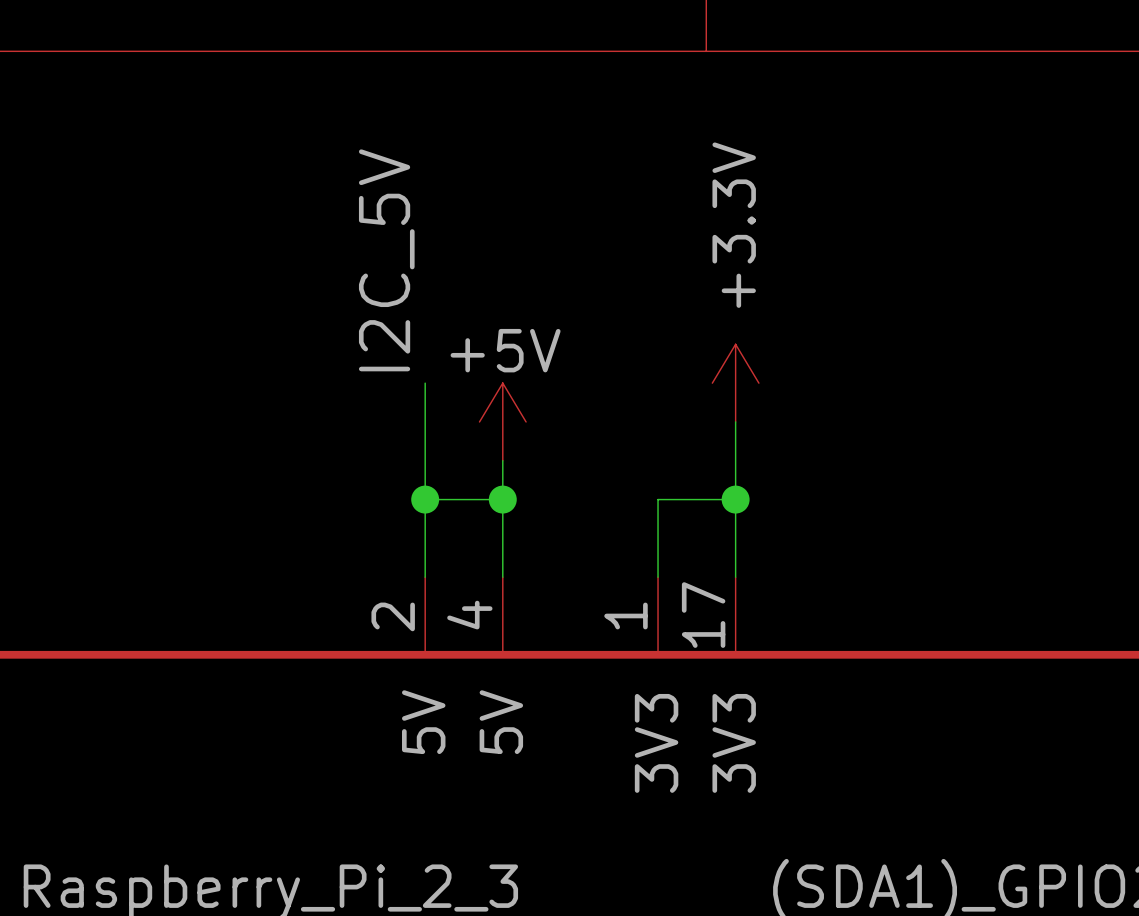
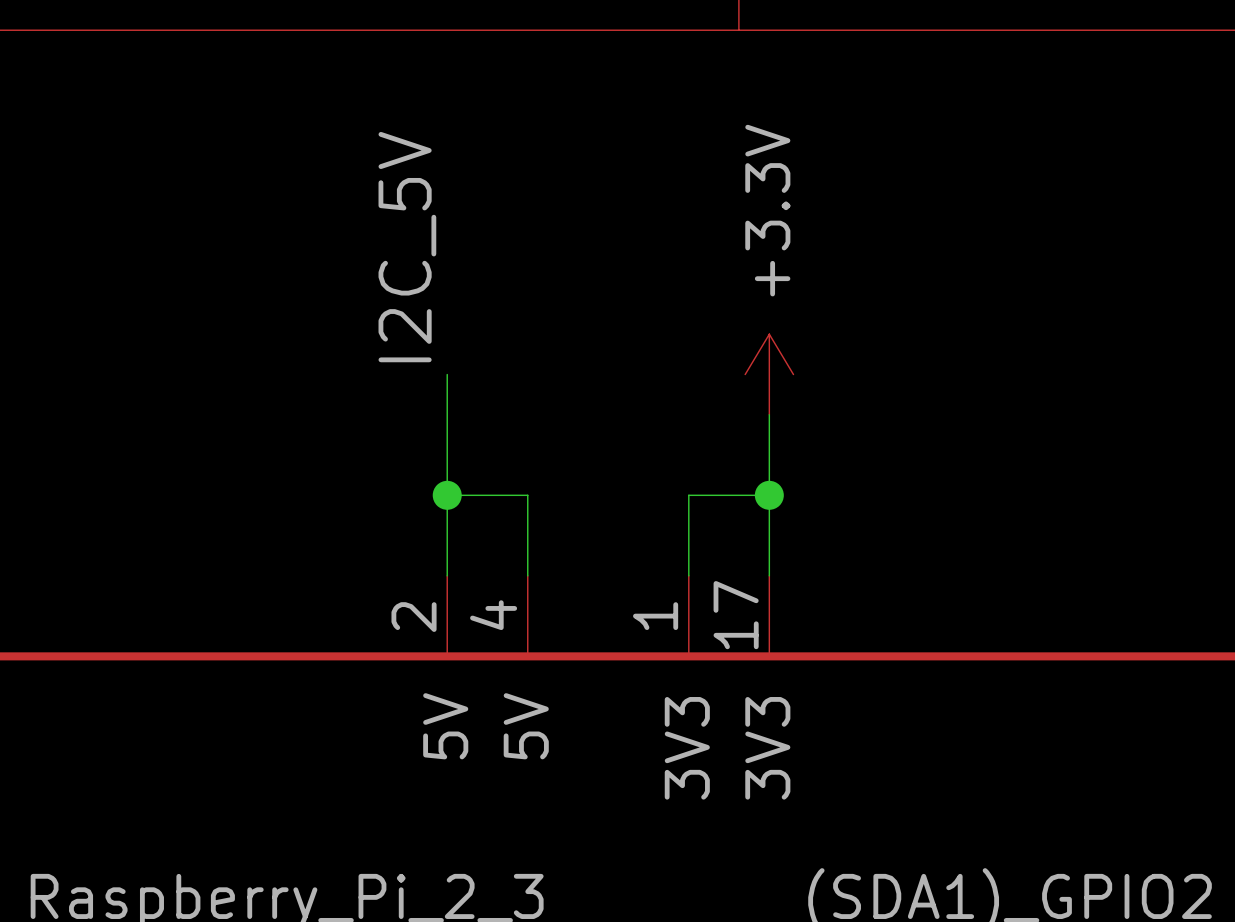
power symbol: +5V (502, 421) -> none
wire: (502, 460) (502, 499) -> none
junction: (502, 499) -> none

